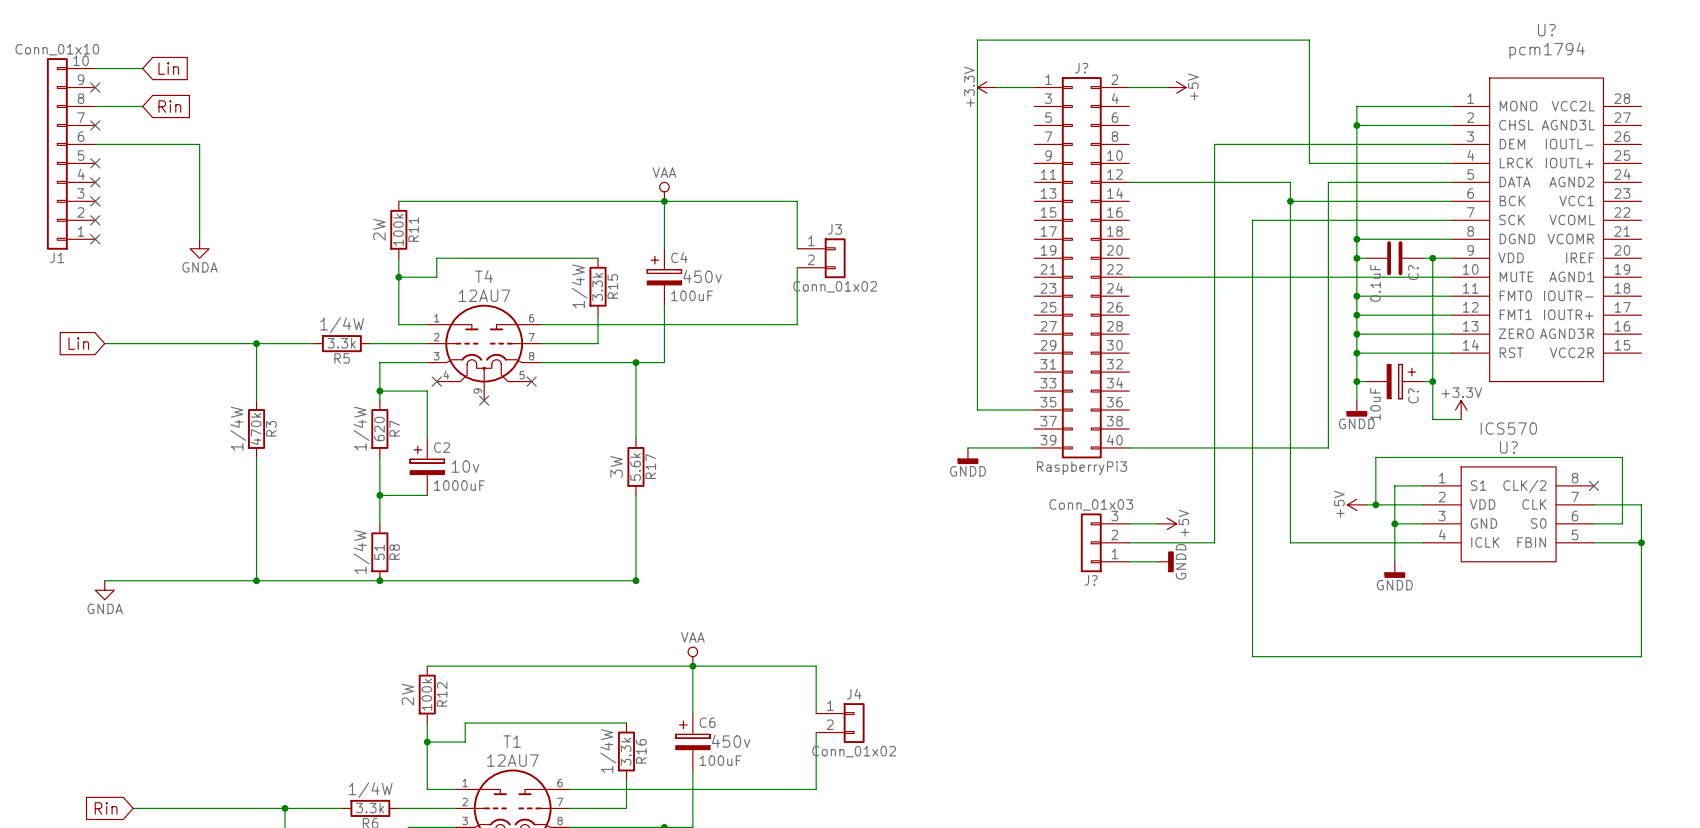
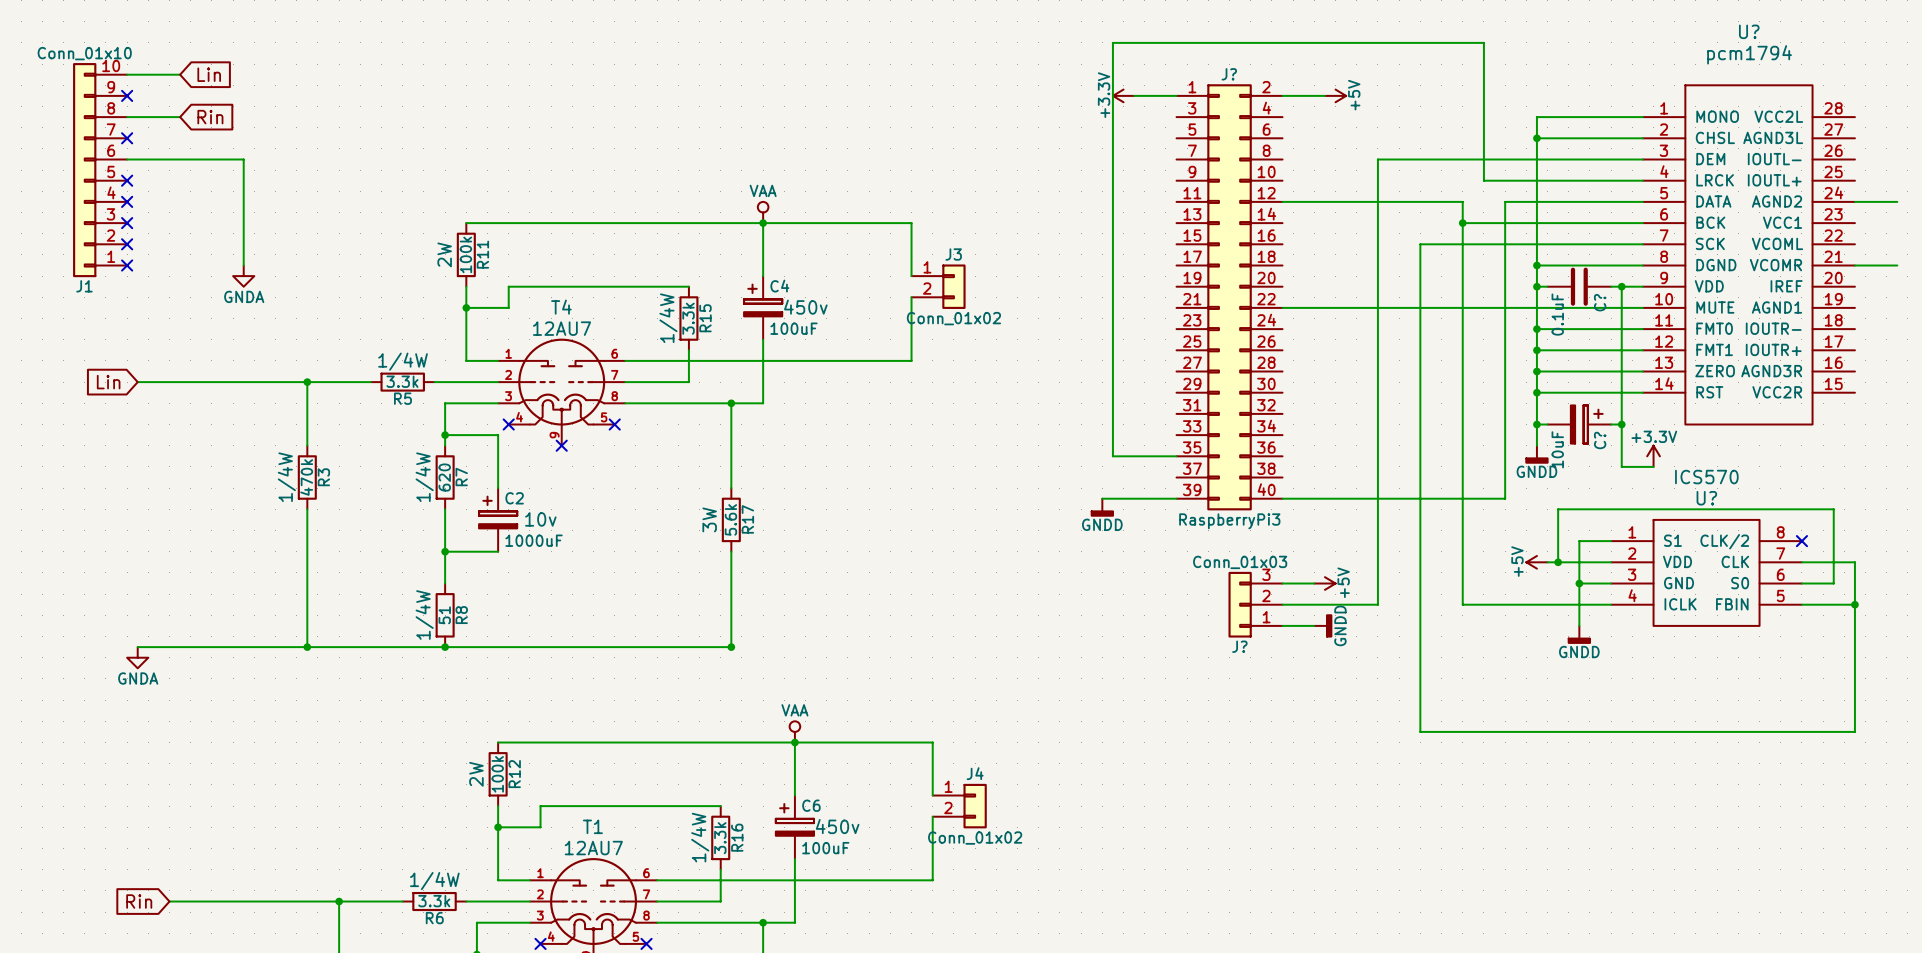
wire: none -> (1854, 201) (1897, 201)
wire: none -> (1854, 265) (1897, 265)

